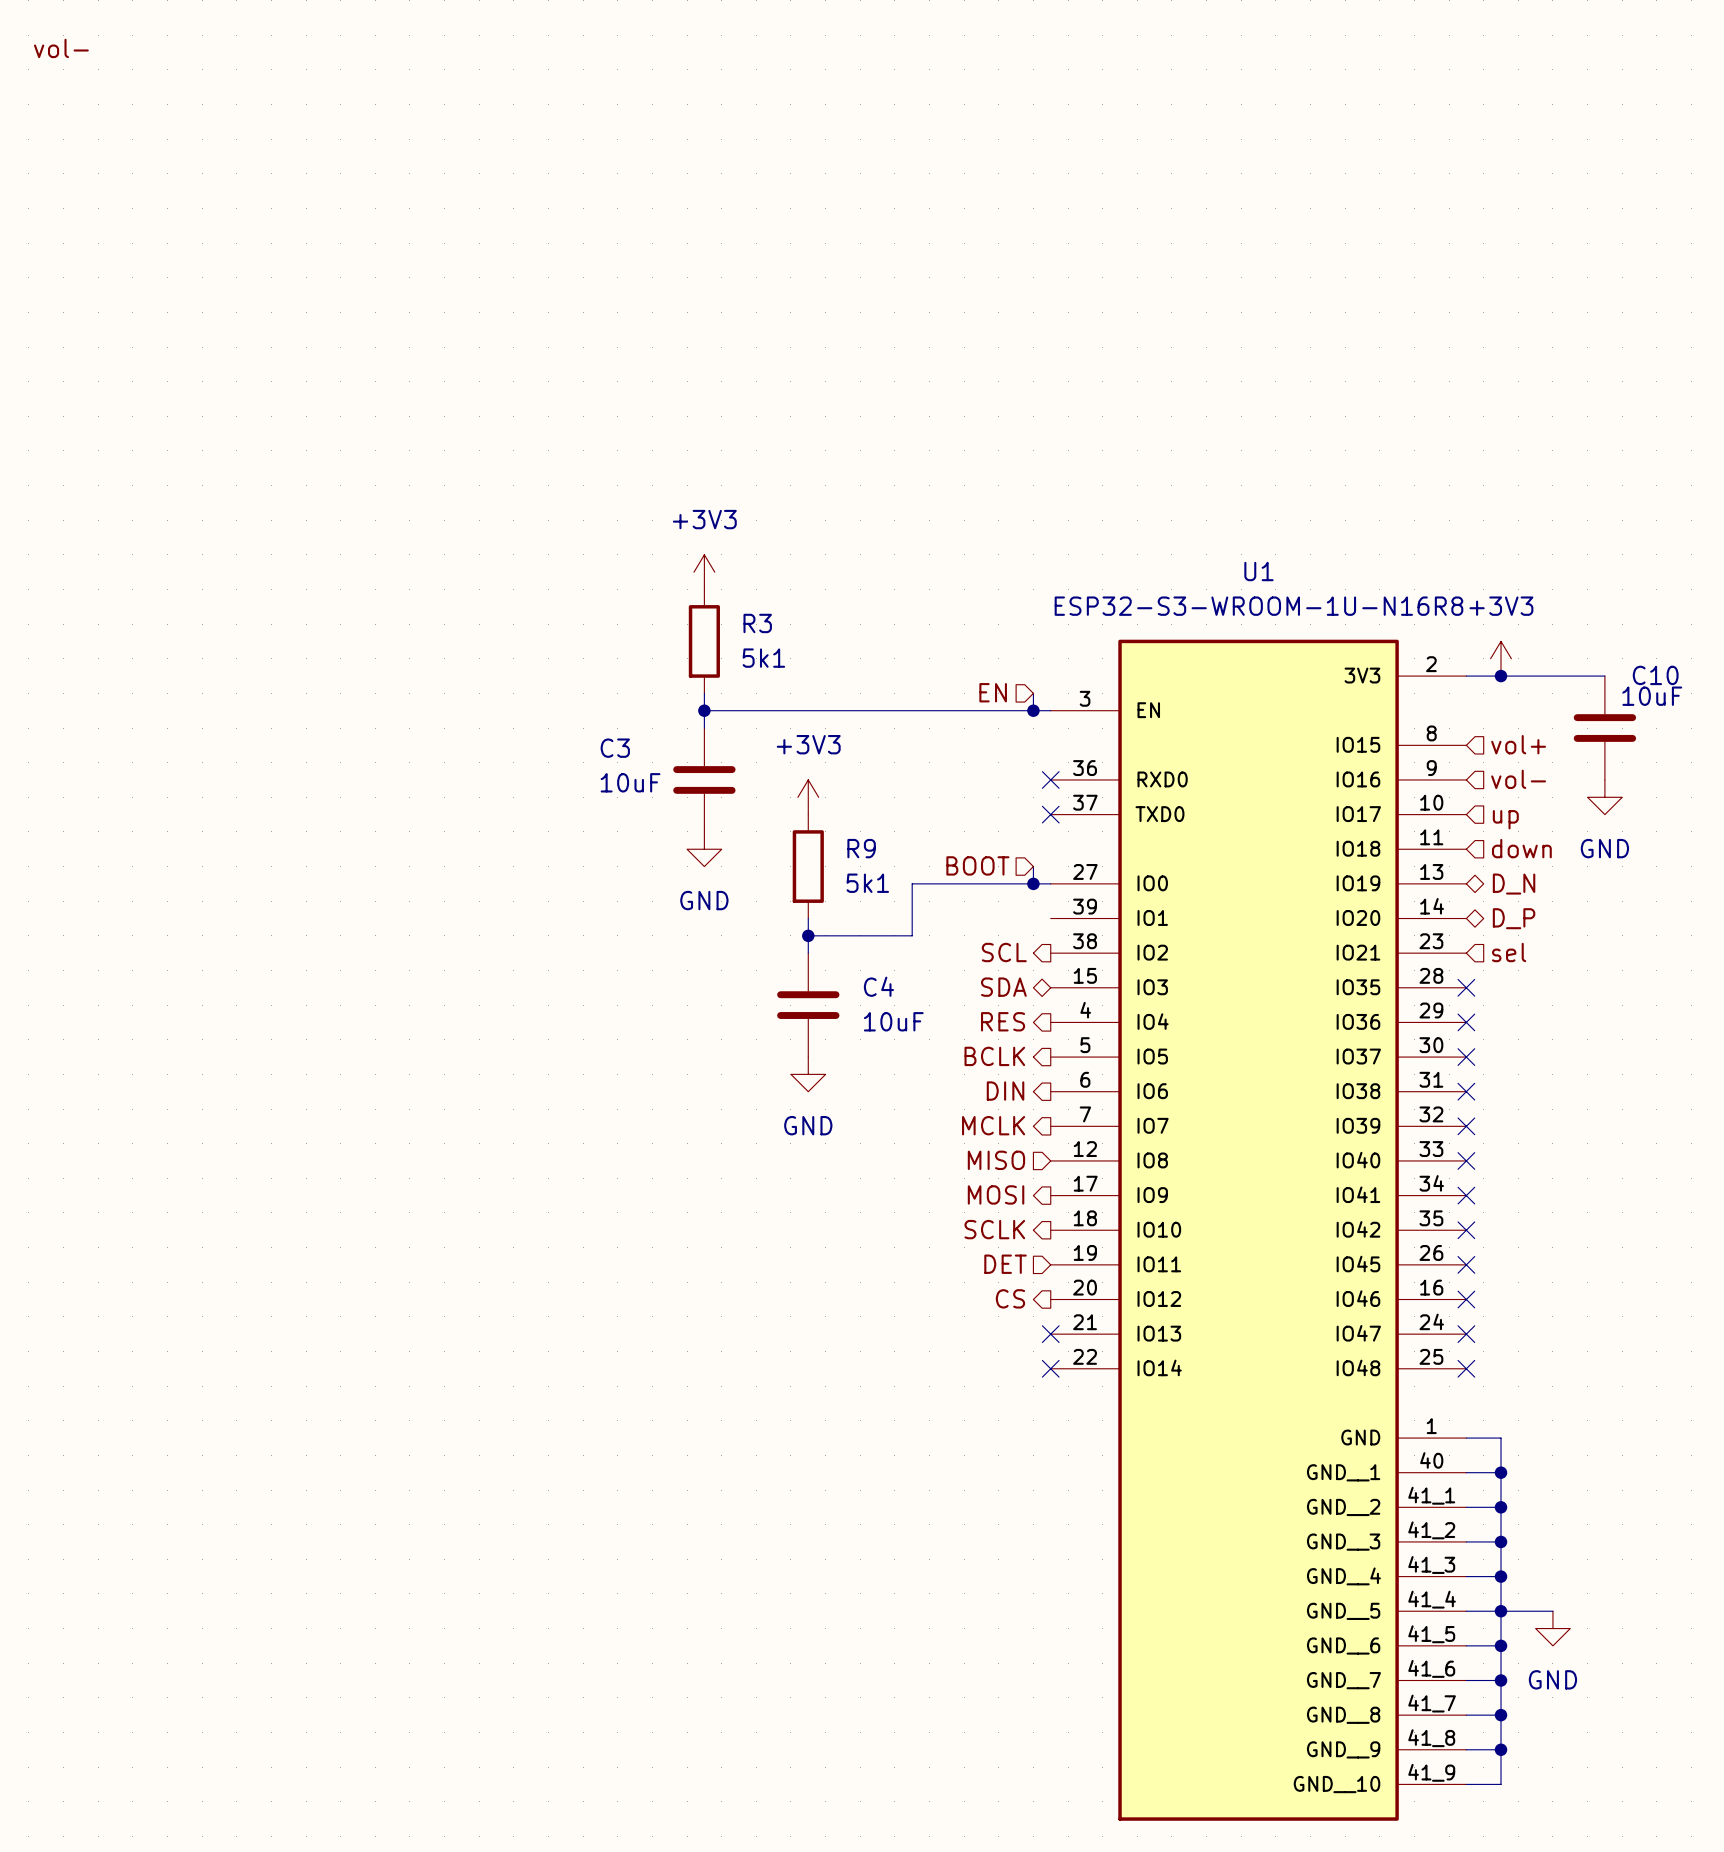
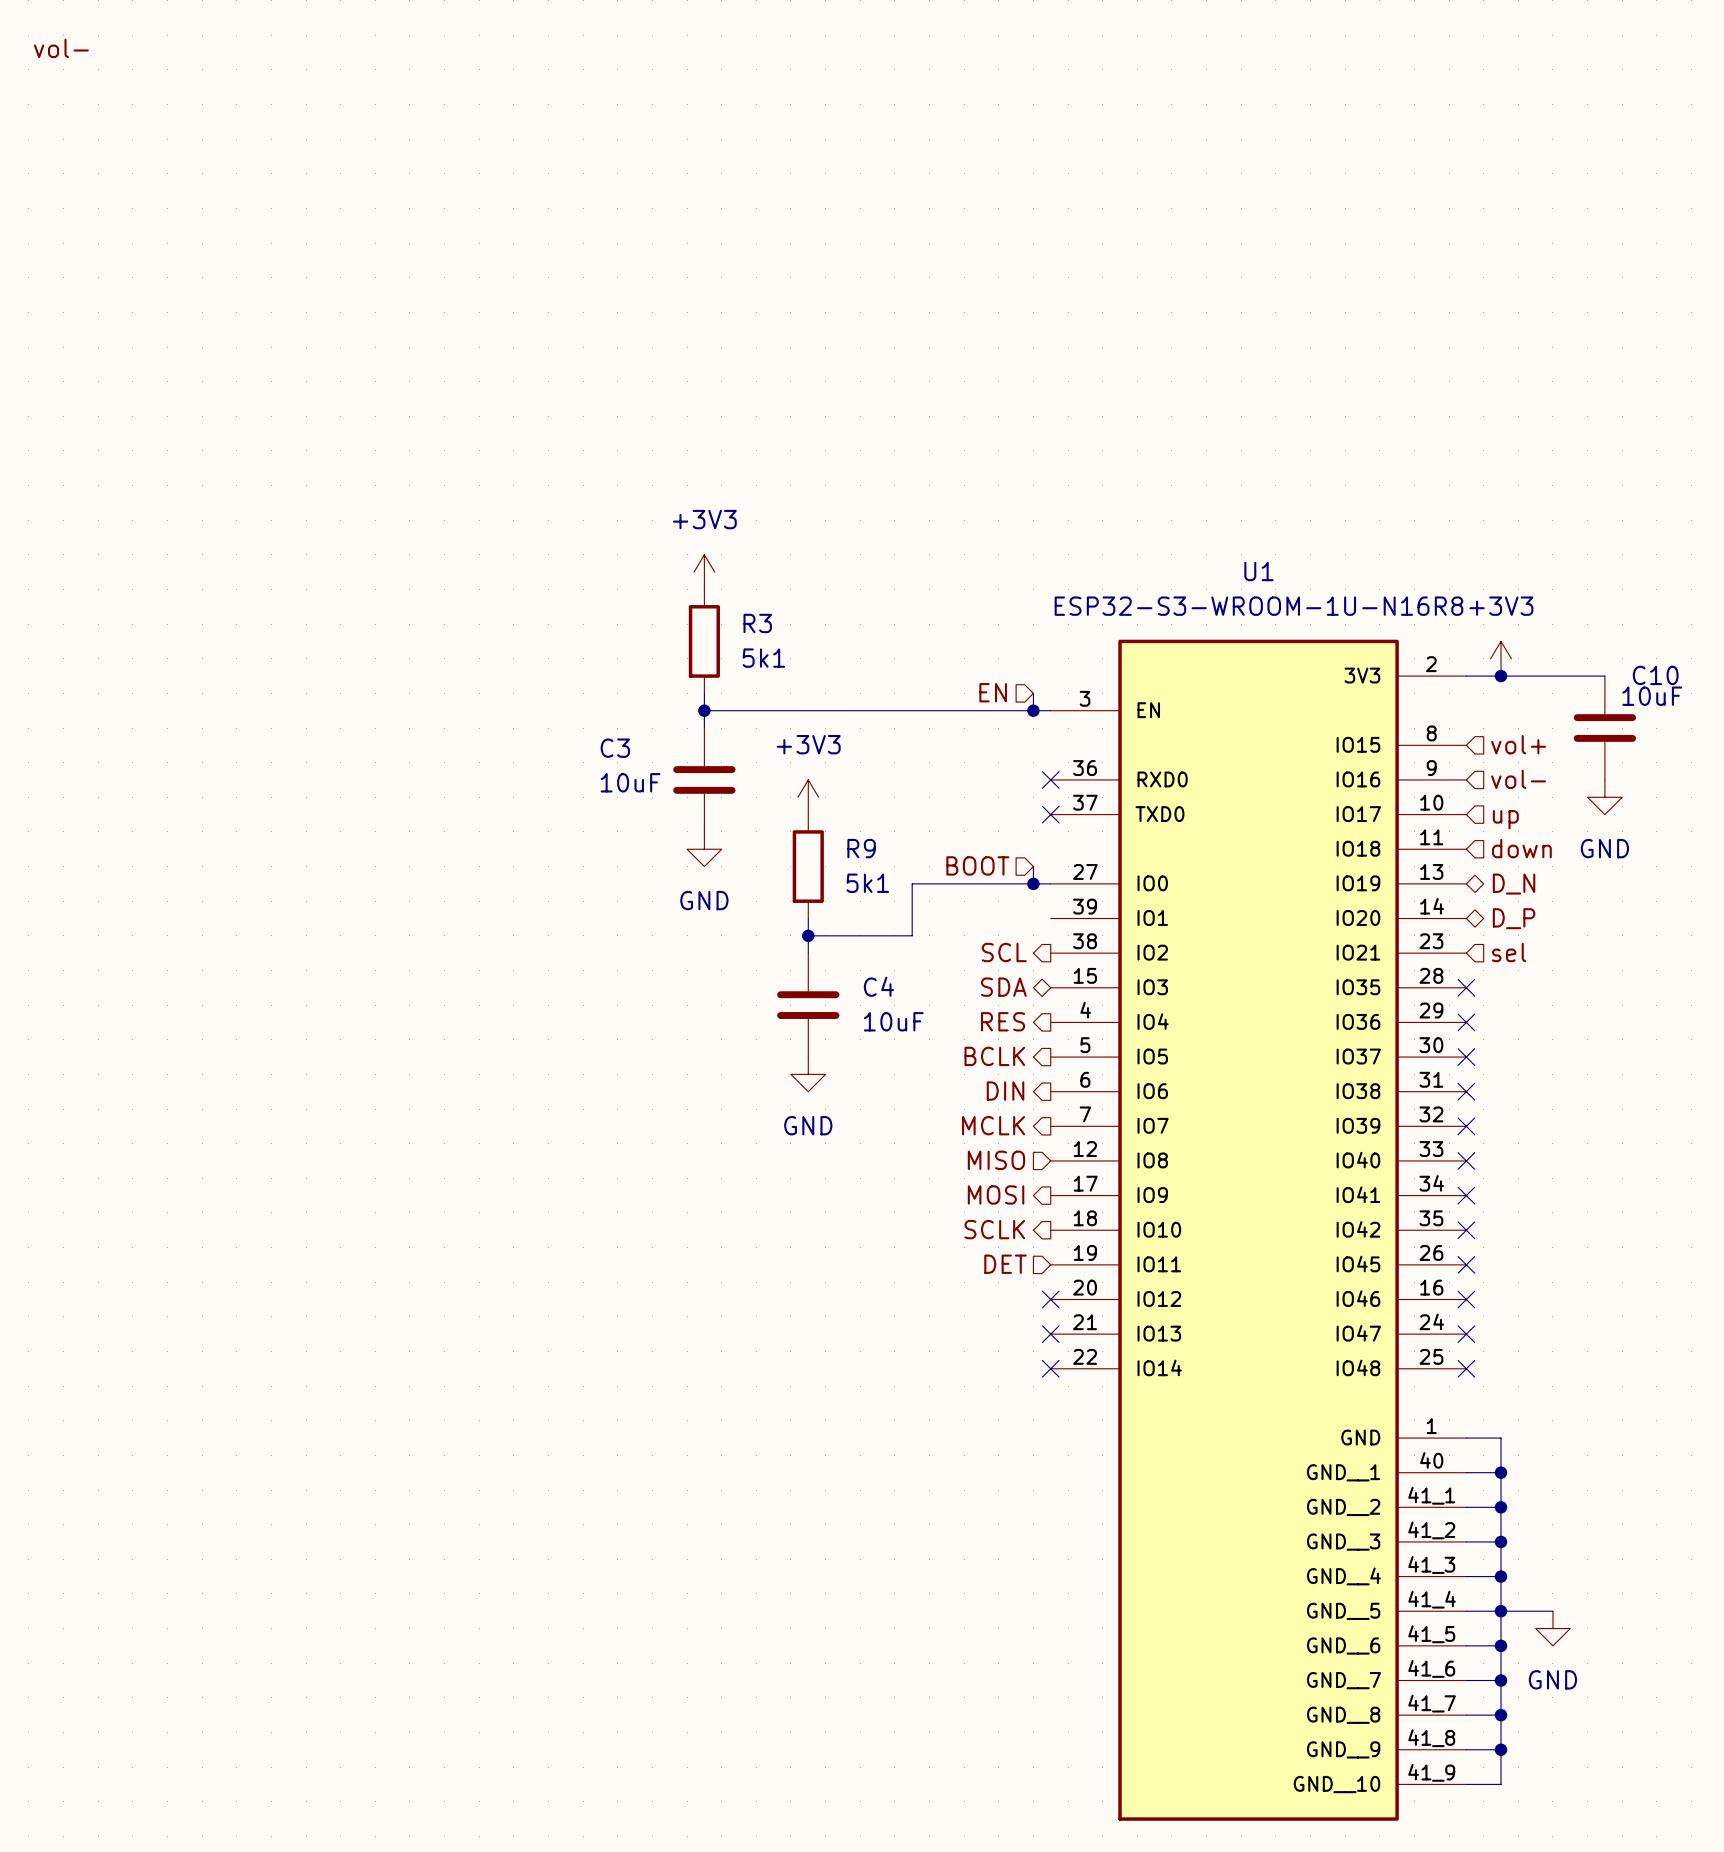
hierarchical label: CS (1010, 1298) -> none
no-connect mark: none -> (1050, 1299)

